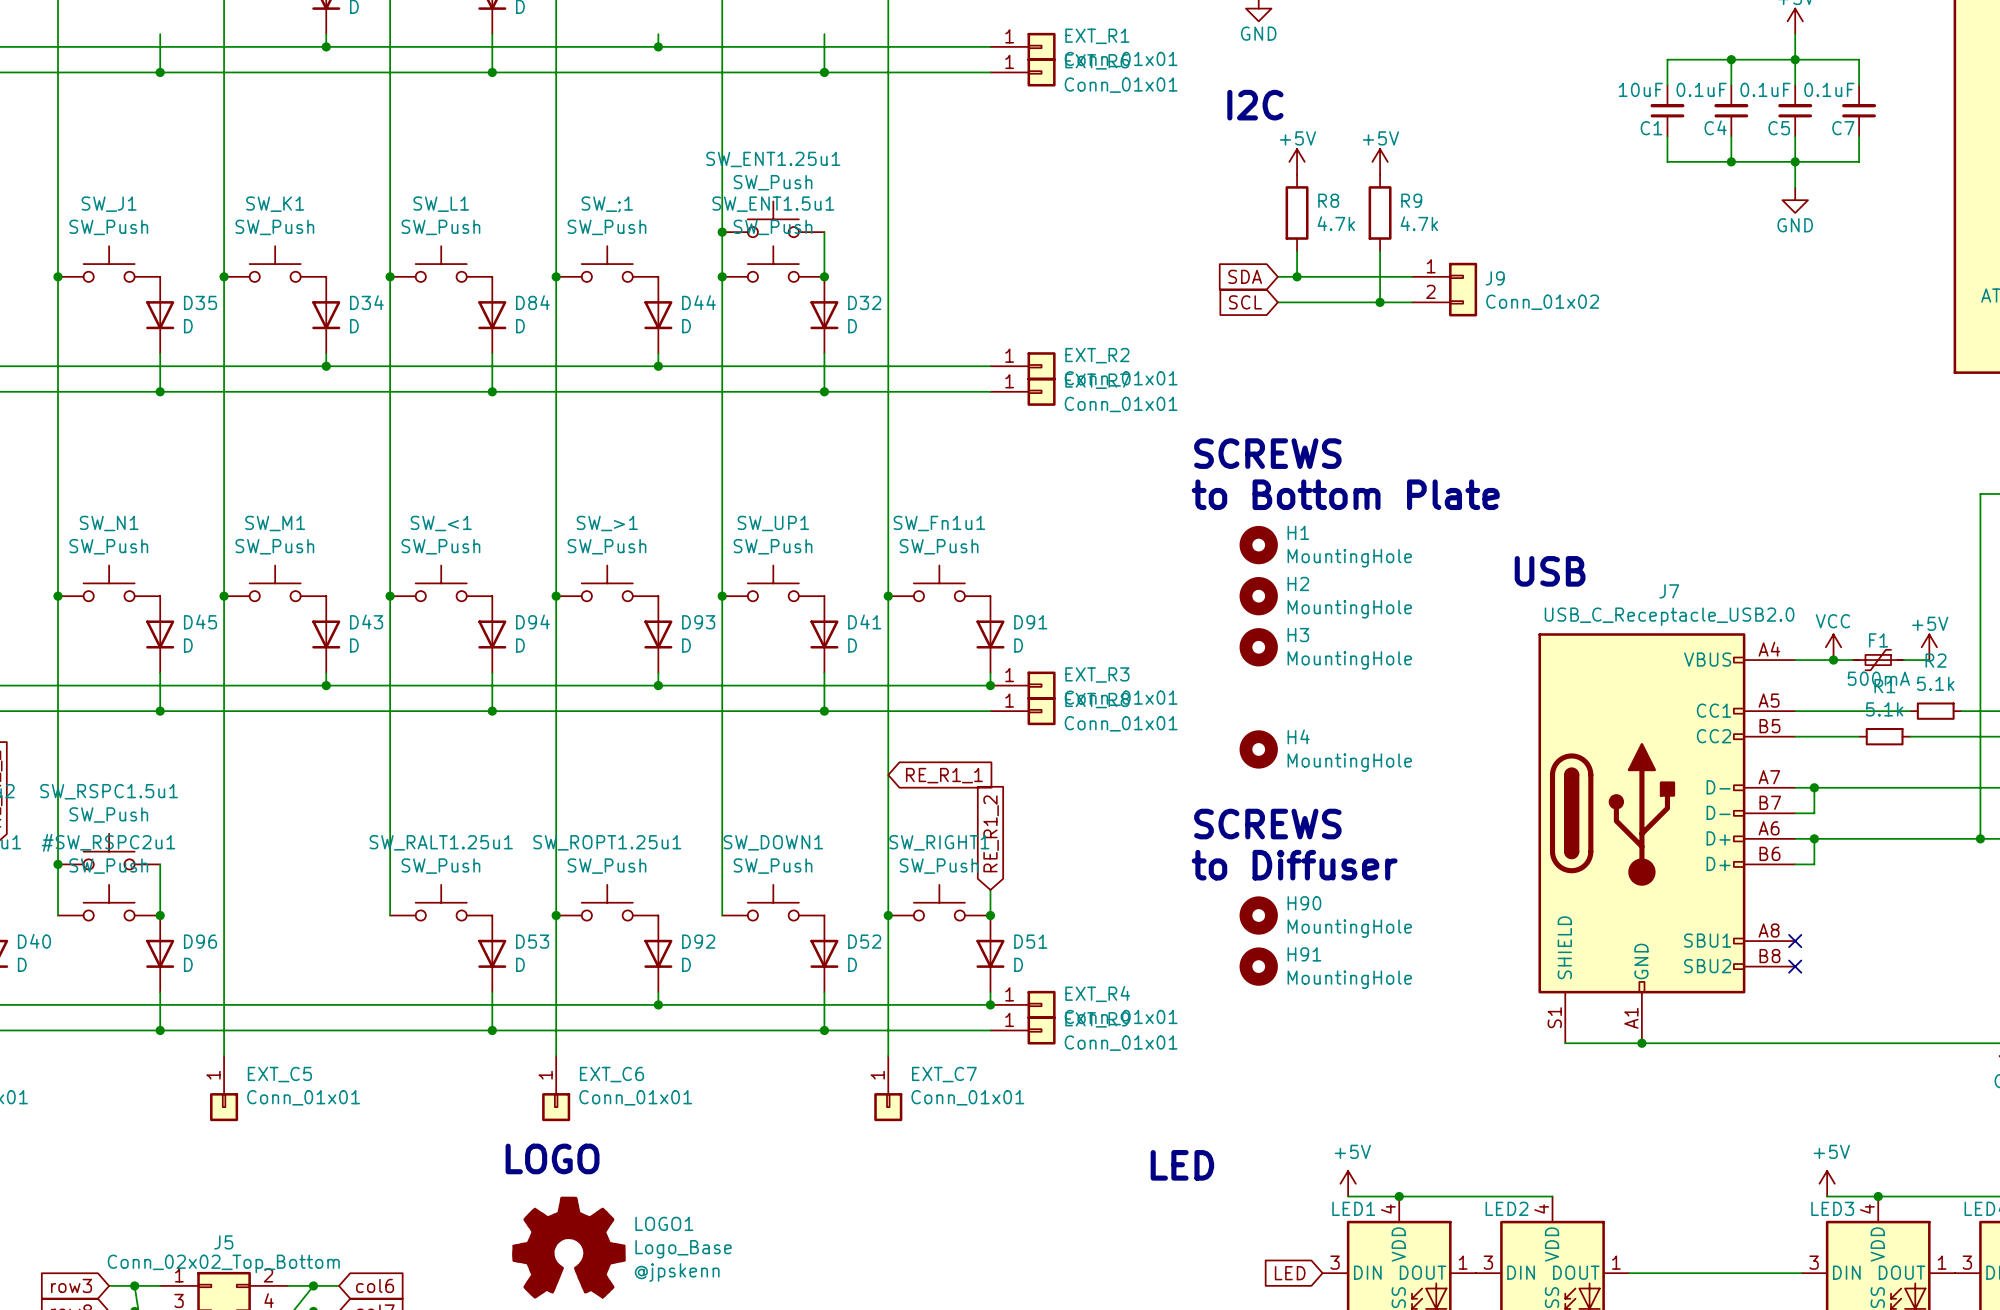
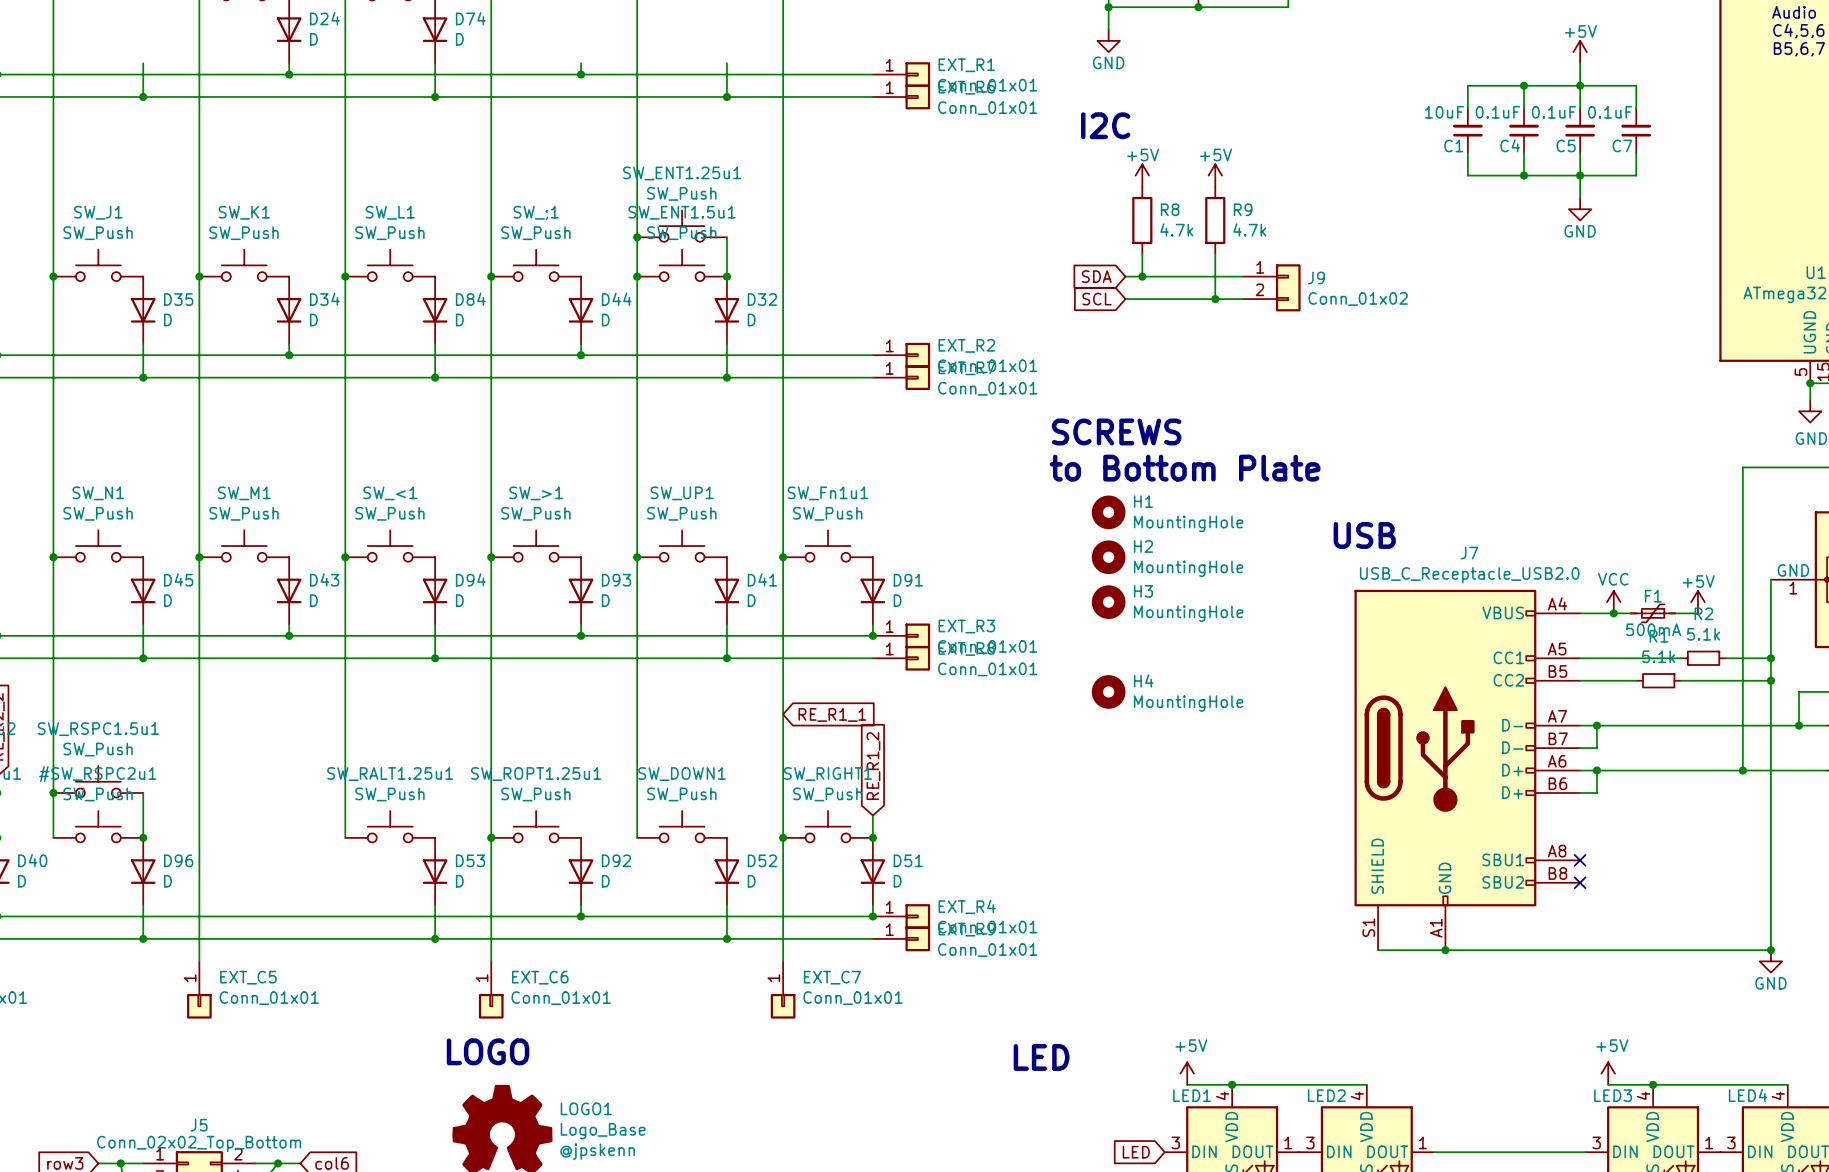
text: SCREWS (1267, 824) -> none
text: to Diffuser (1294, 865) -> none
H90: MountingHole (1258, 915) -> none
H91: MountingHole (1258, 966) -> none

